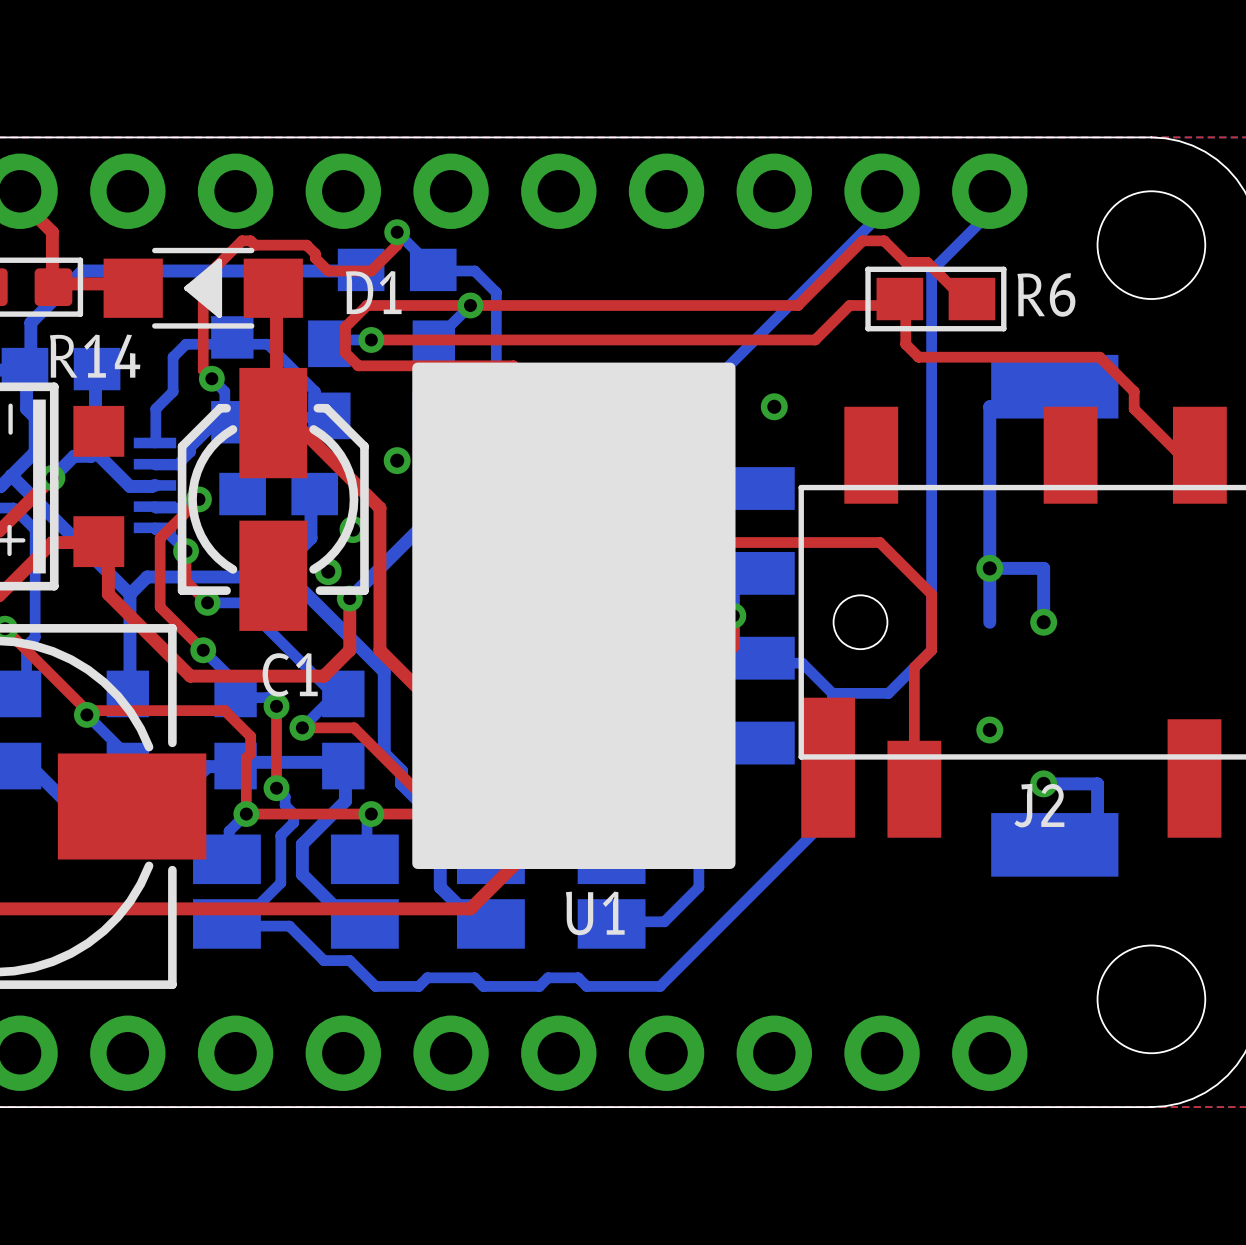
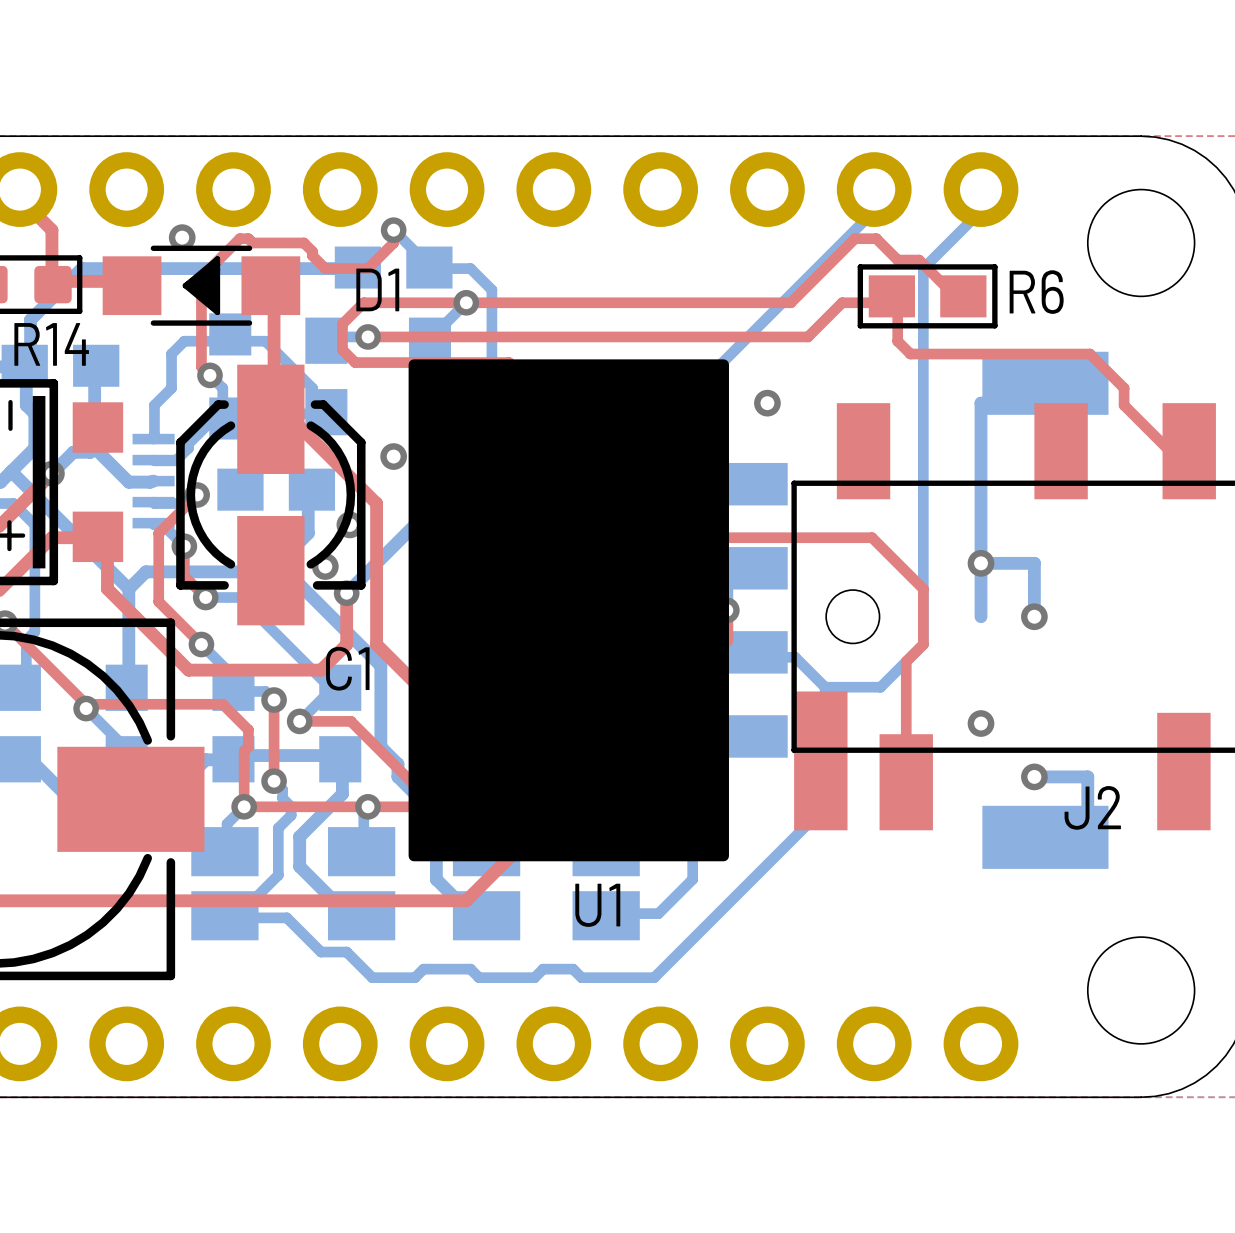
via: none -> (182, 237)
R14 name position: R14 (95, 356) -> R14 (51, 344)
C1 name position: C1 (290, 674) -> C1 (347, 668)
J2 name position: J2 (1039, 805) -> J2 (1092, 807)

